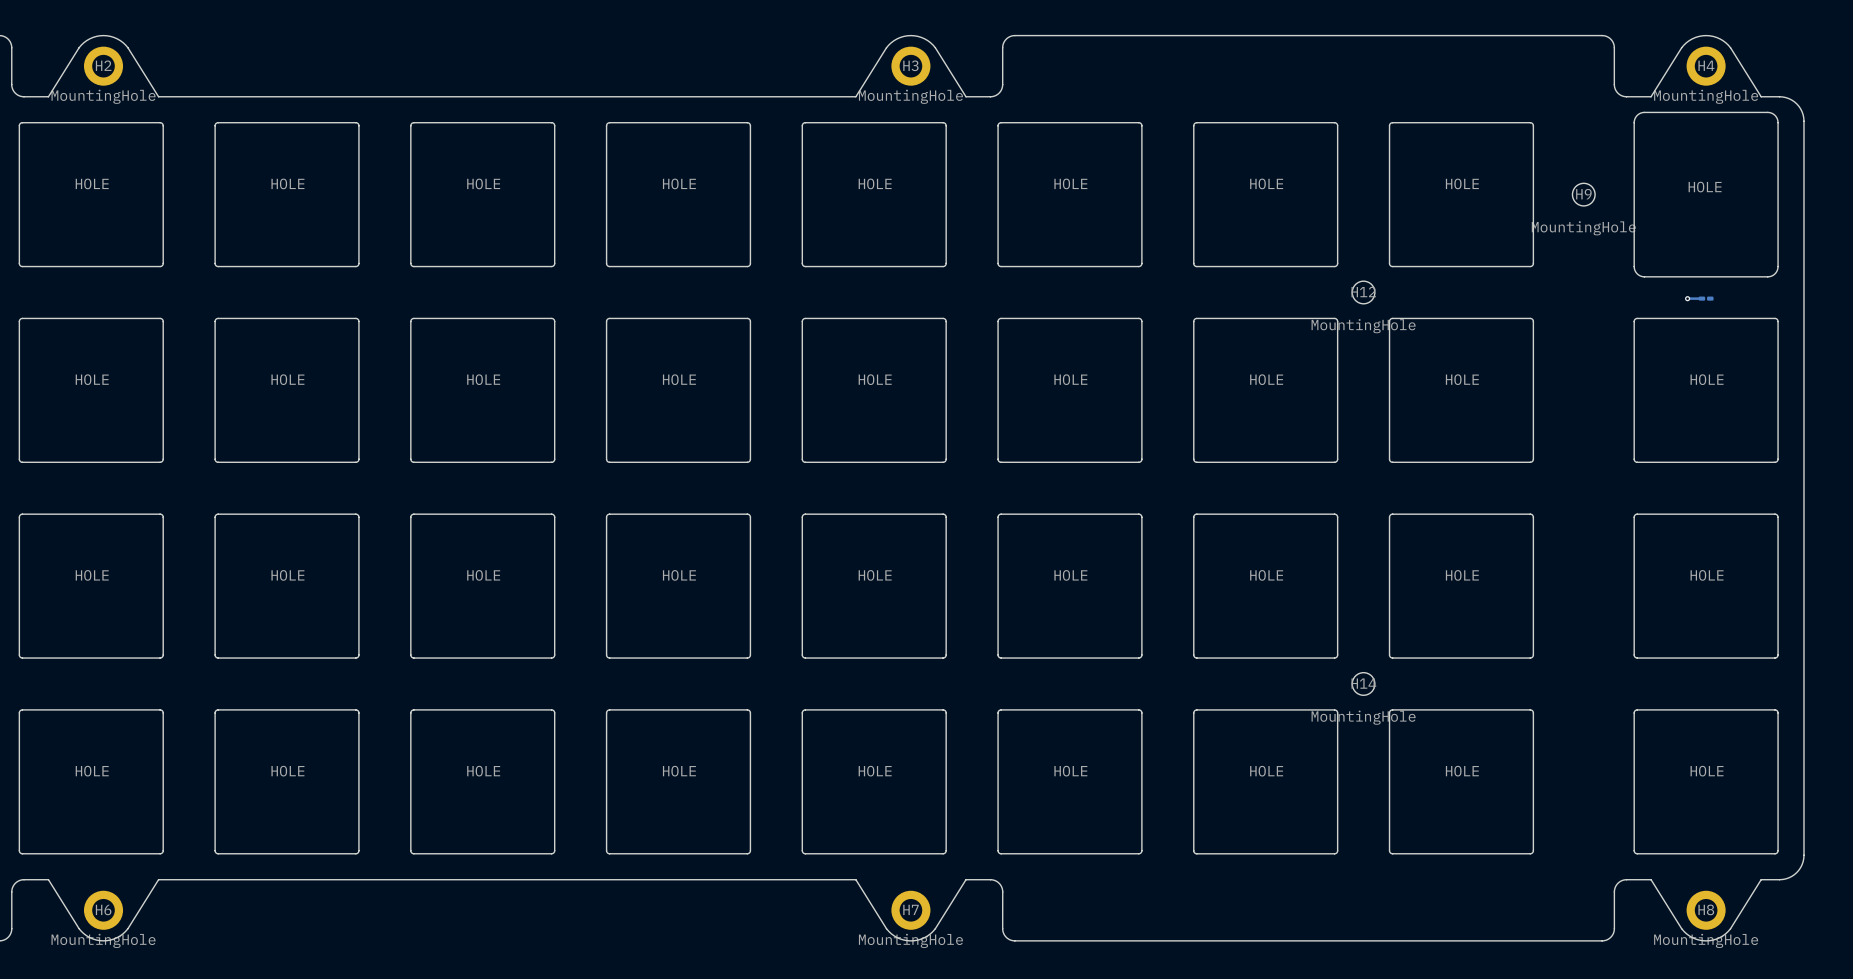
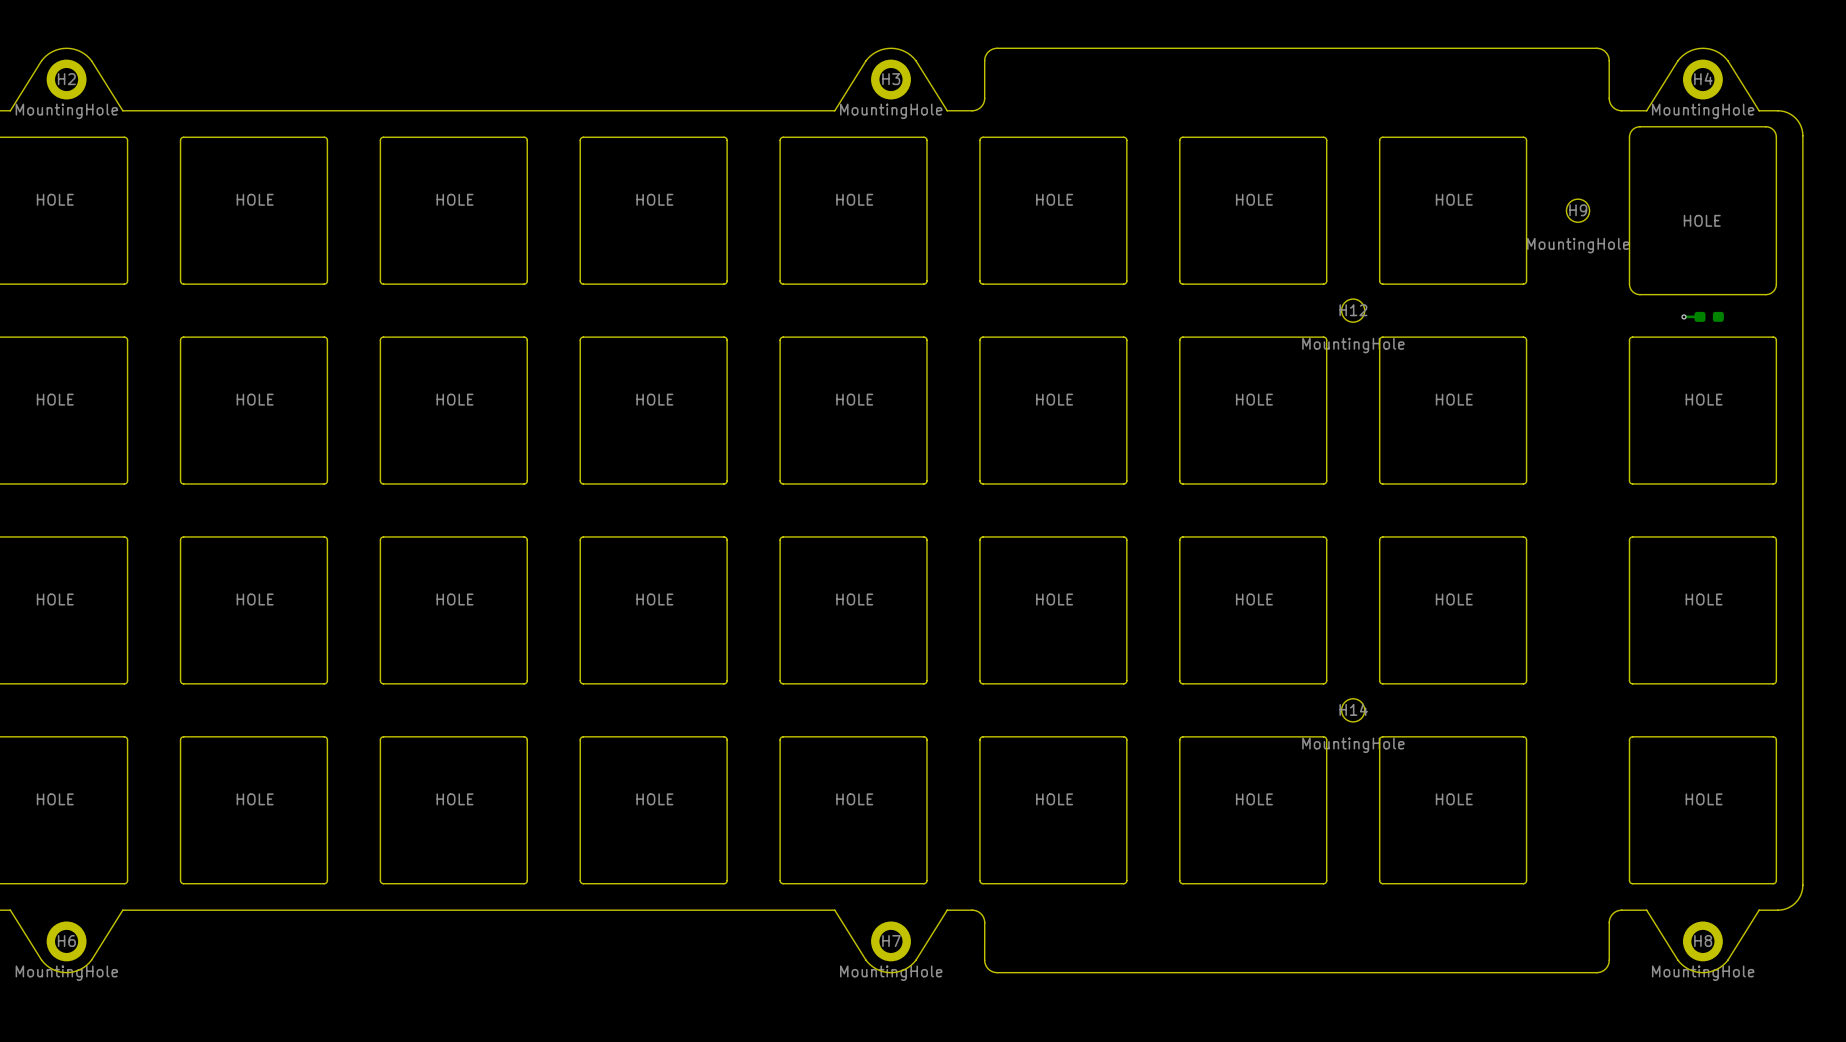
drawing shape: [1633, 111, 1779, 278] -> [1628, 126, 1777, 296]
part footprint: [1698, 296, 1714, 301] -> [1694, 311, 1724, 322]

